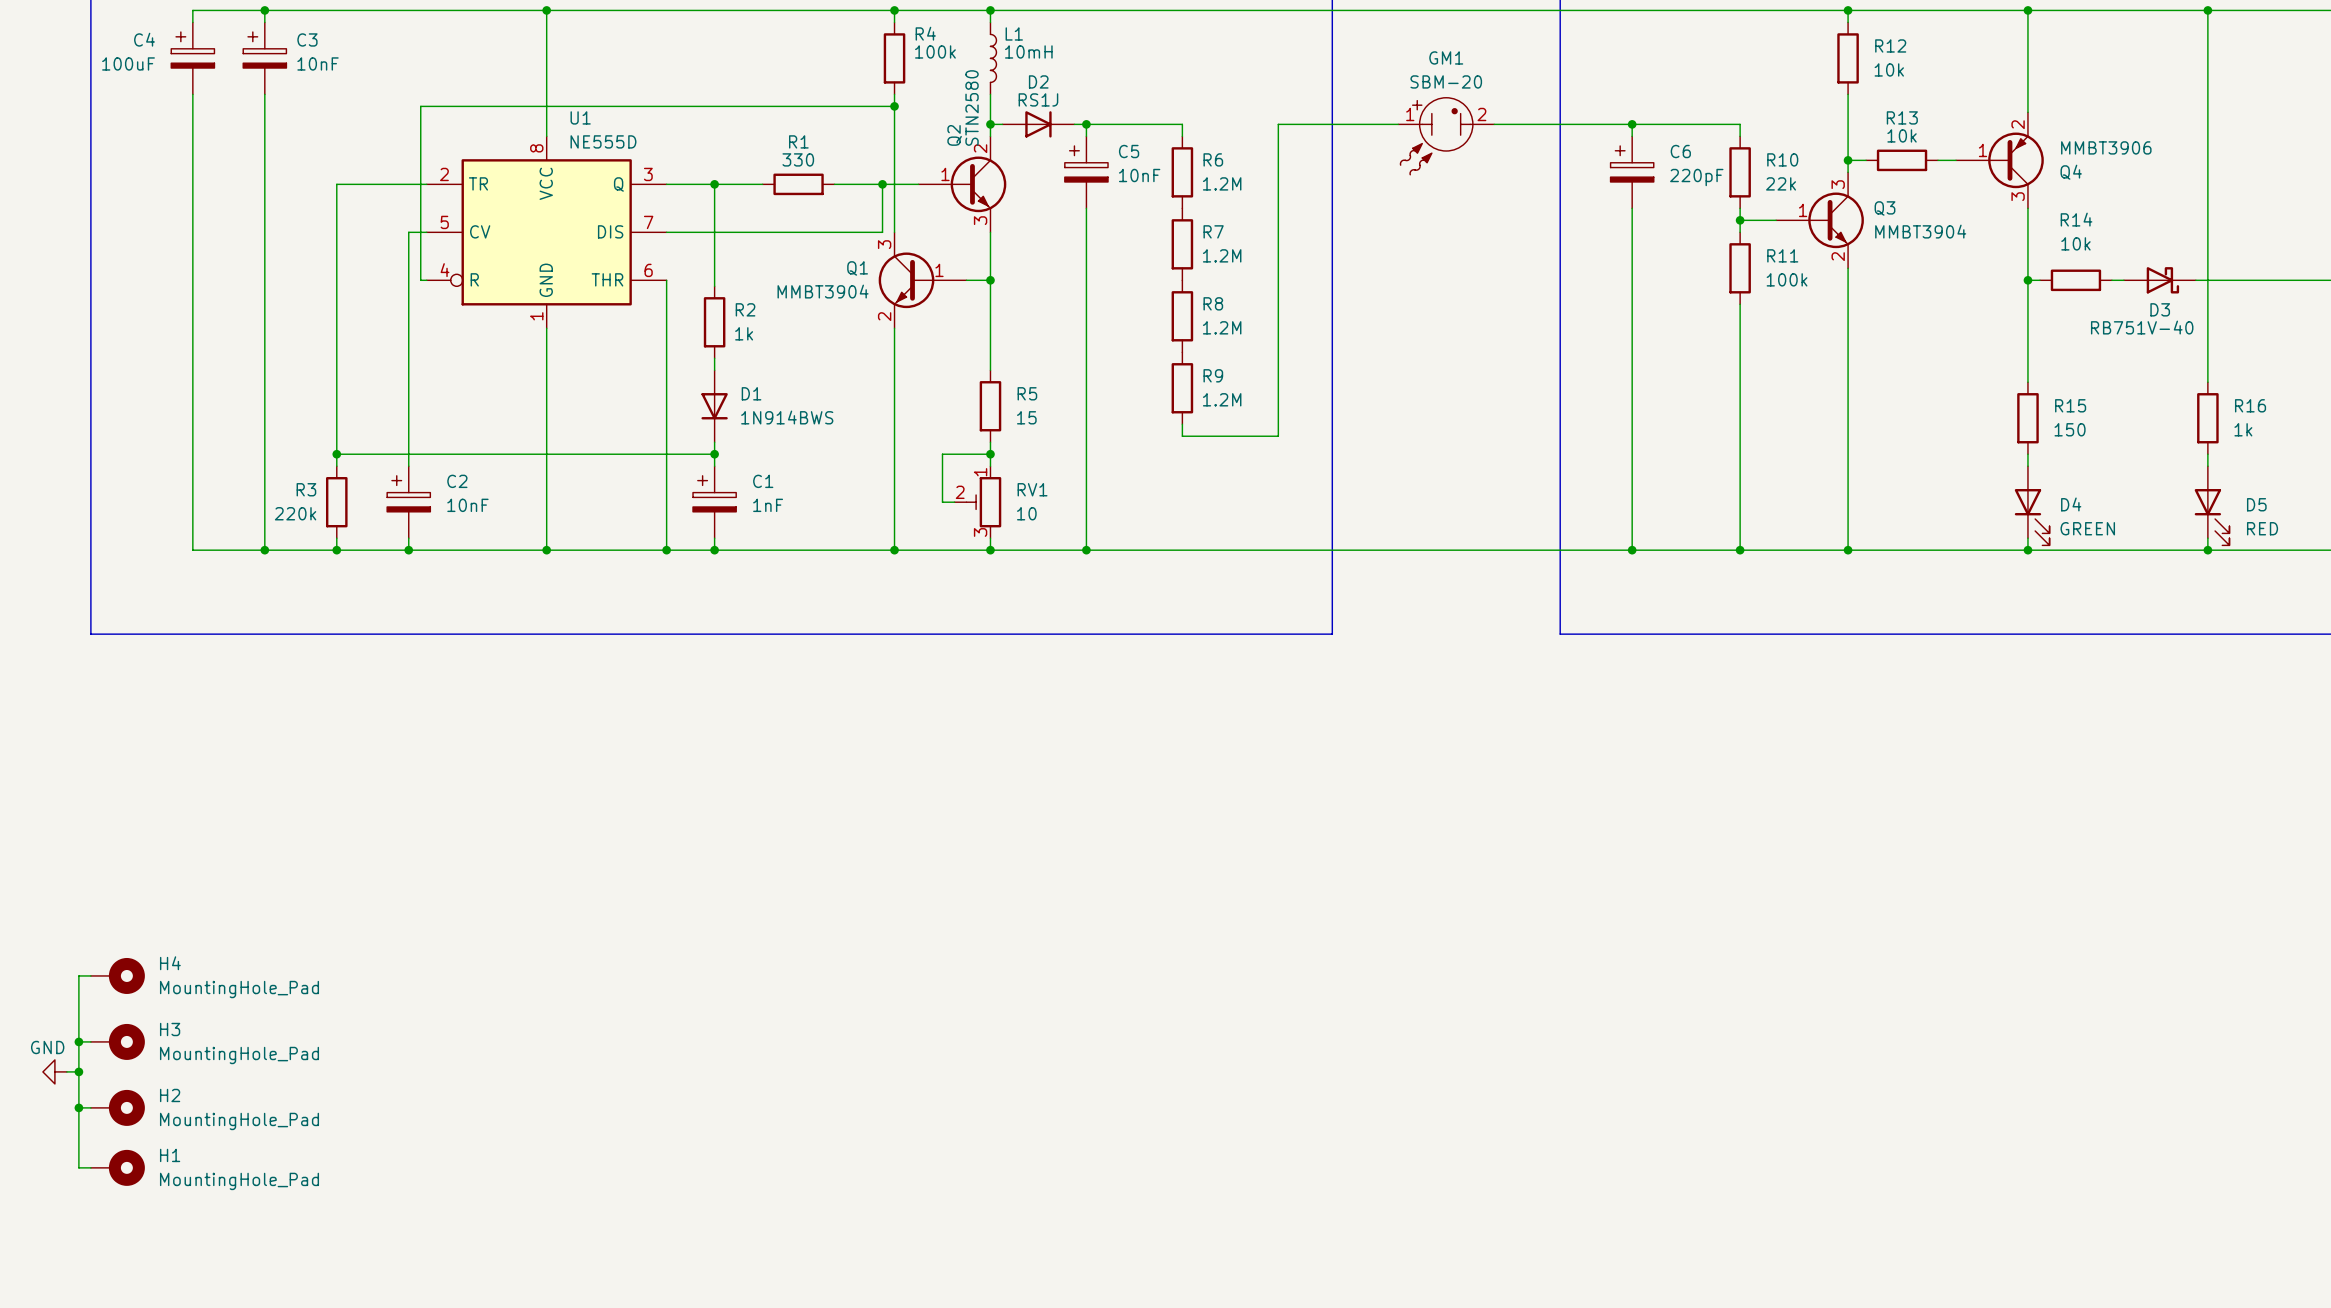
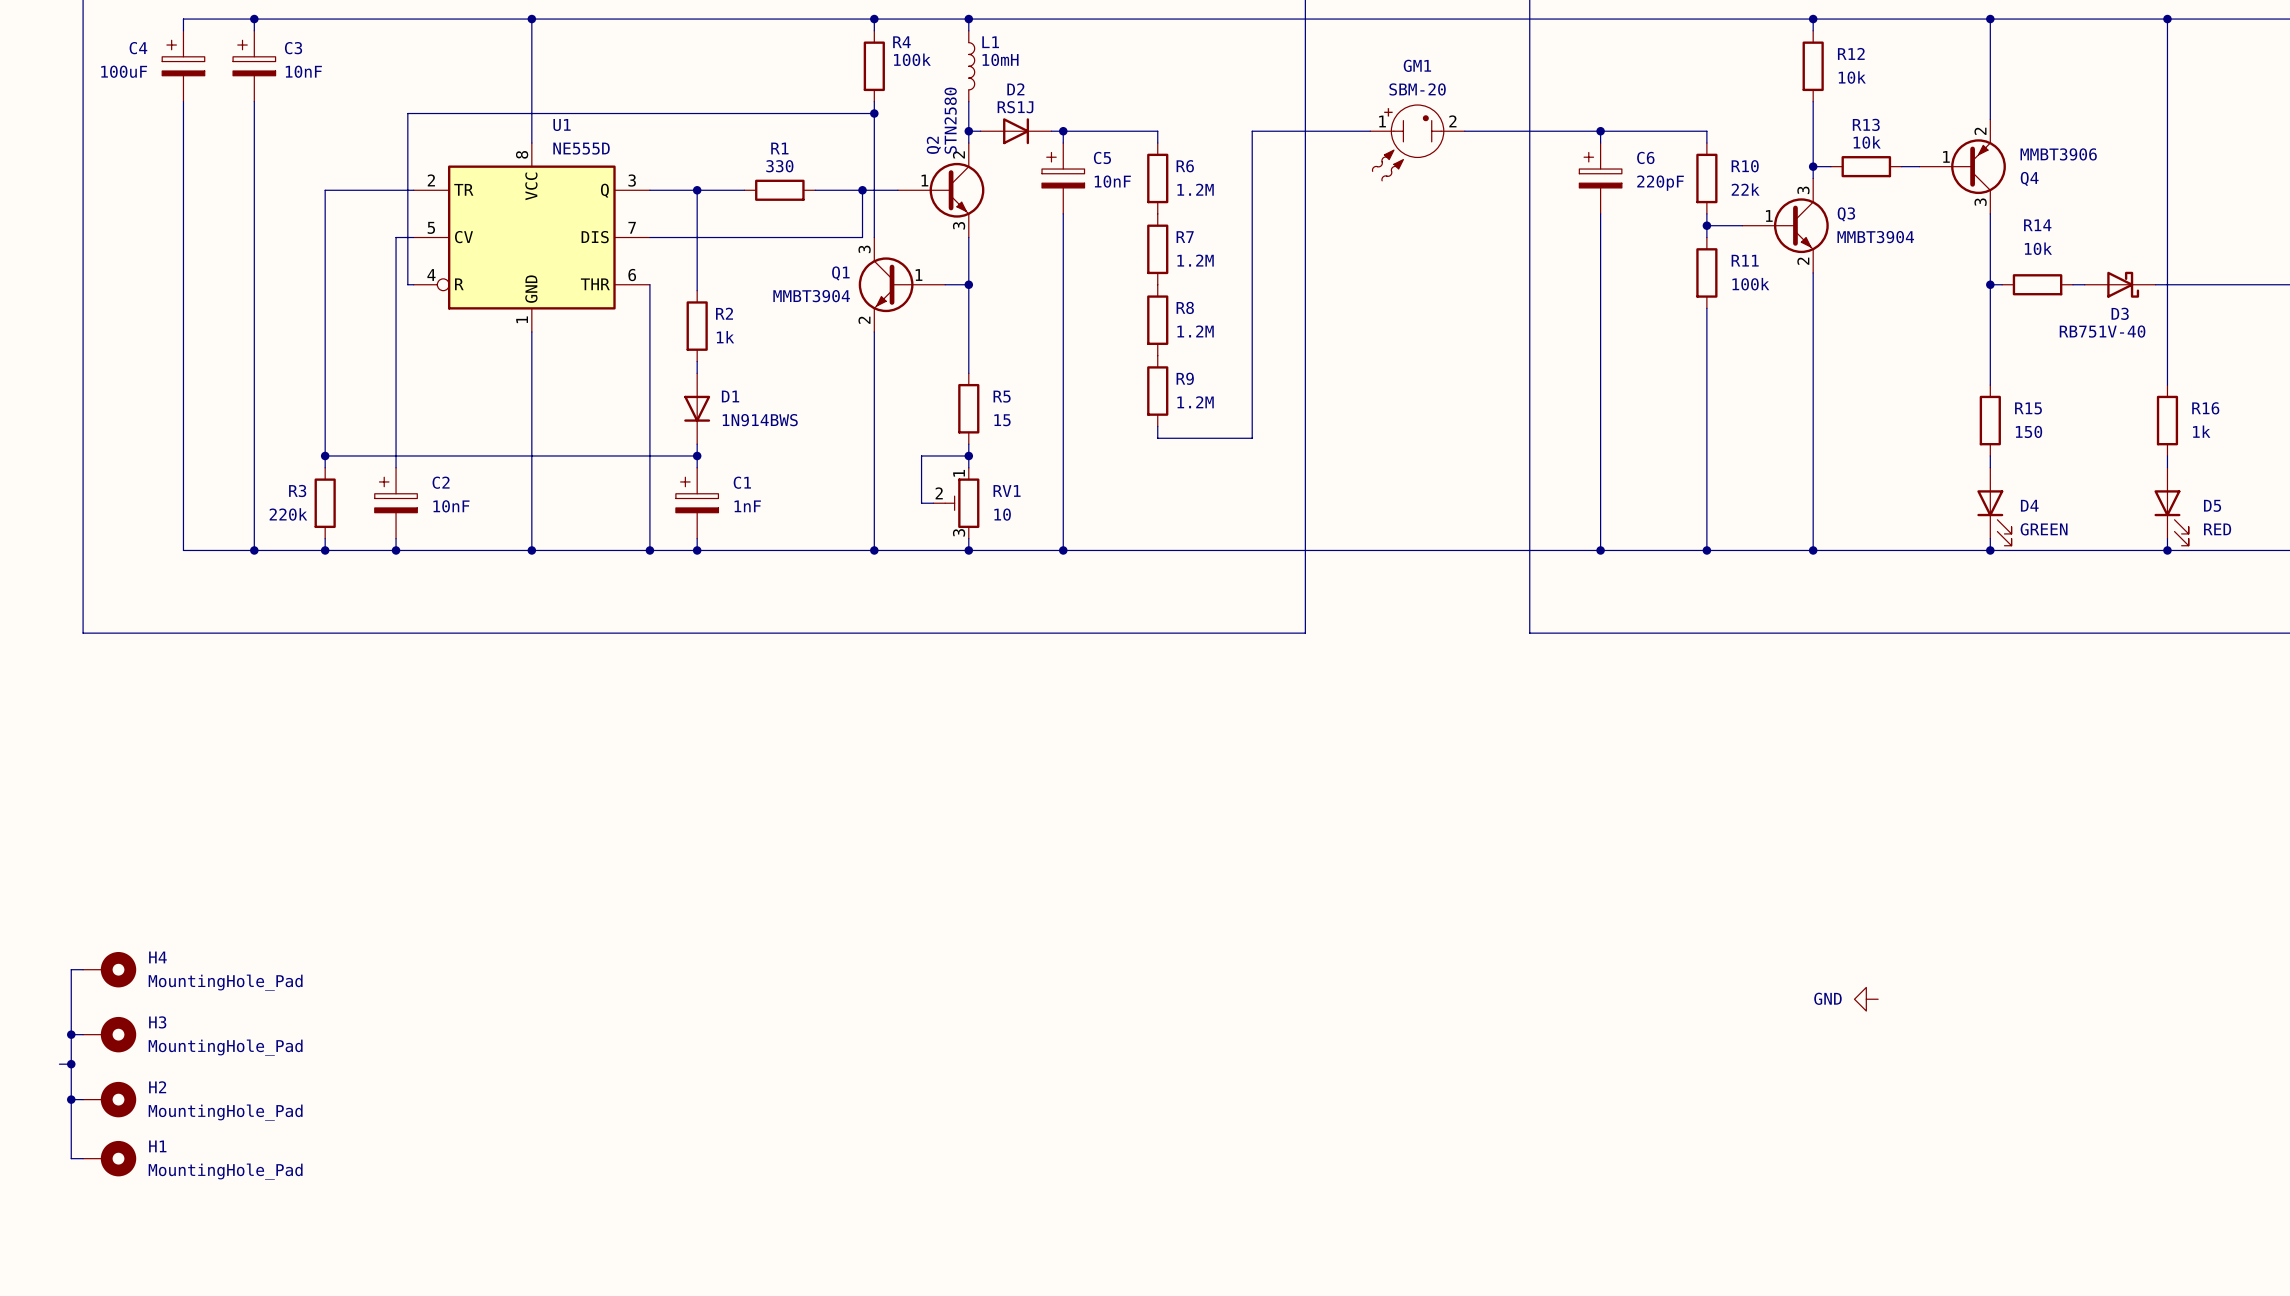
power symbol: none -> GND (1866, 999)
power symbol: GND (54, 1071) -> none

